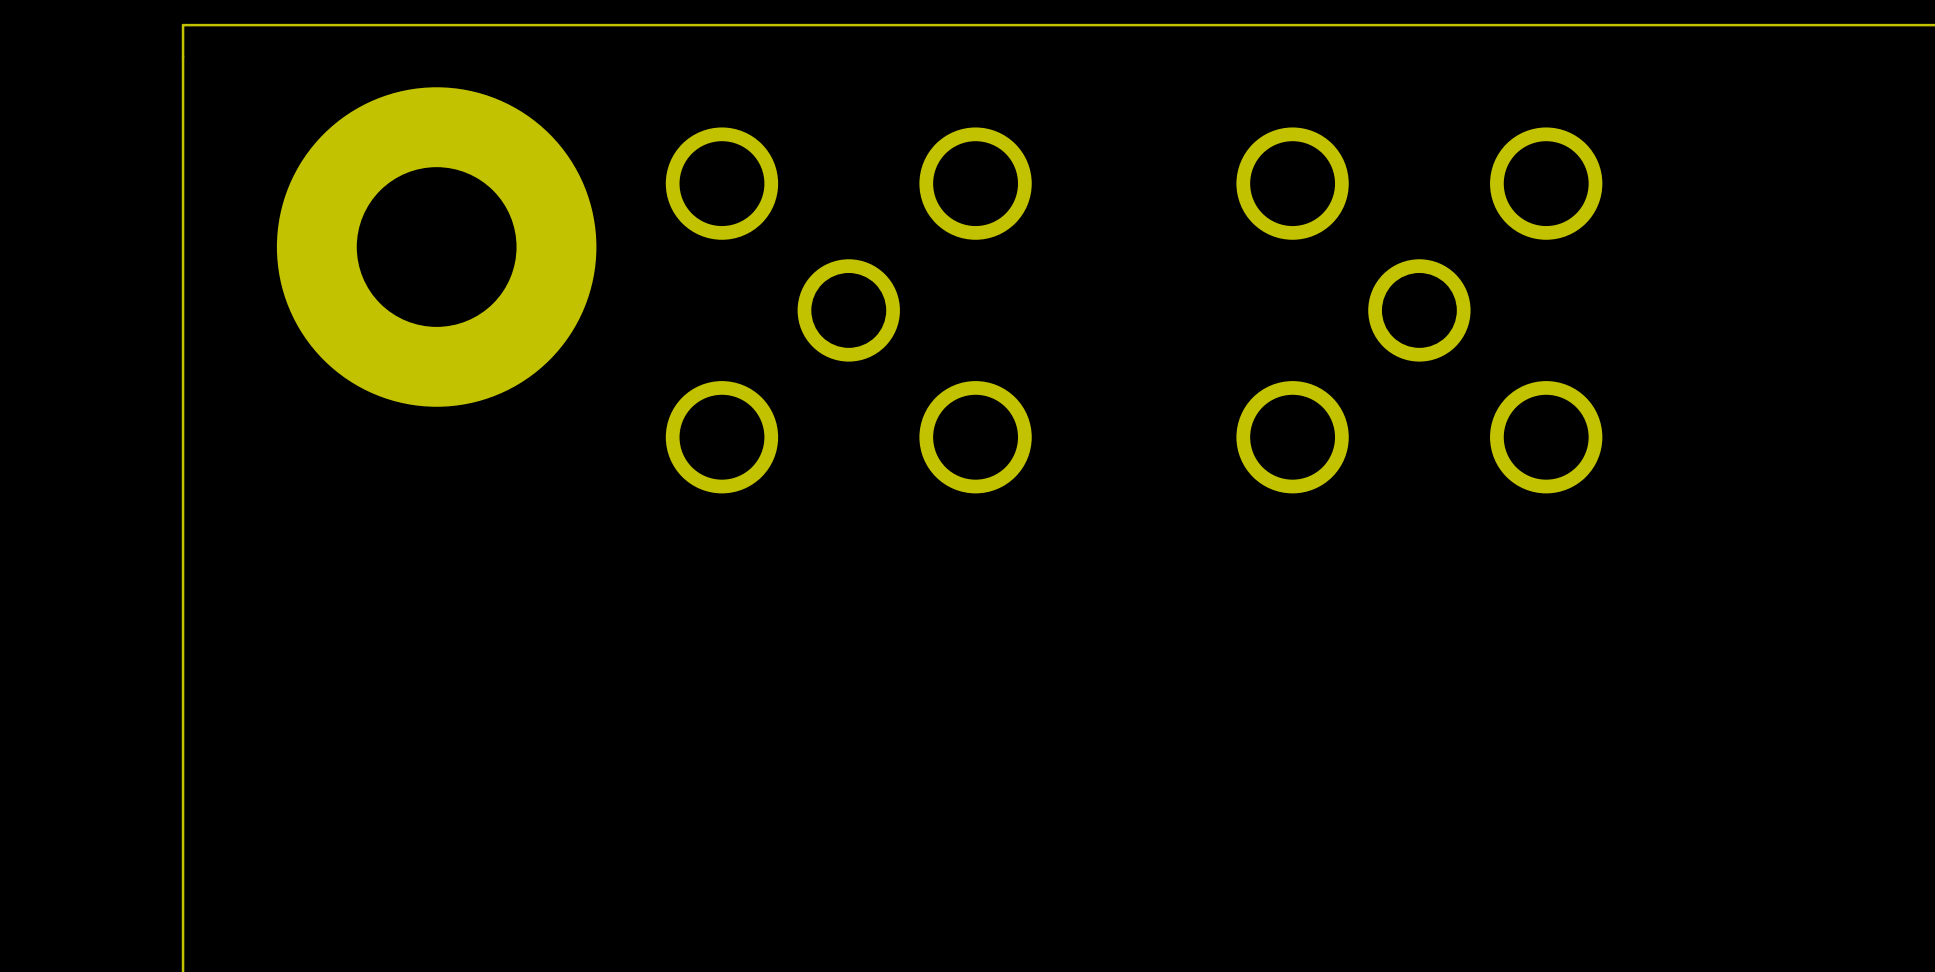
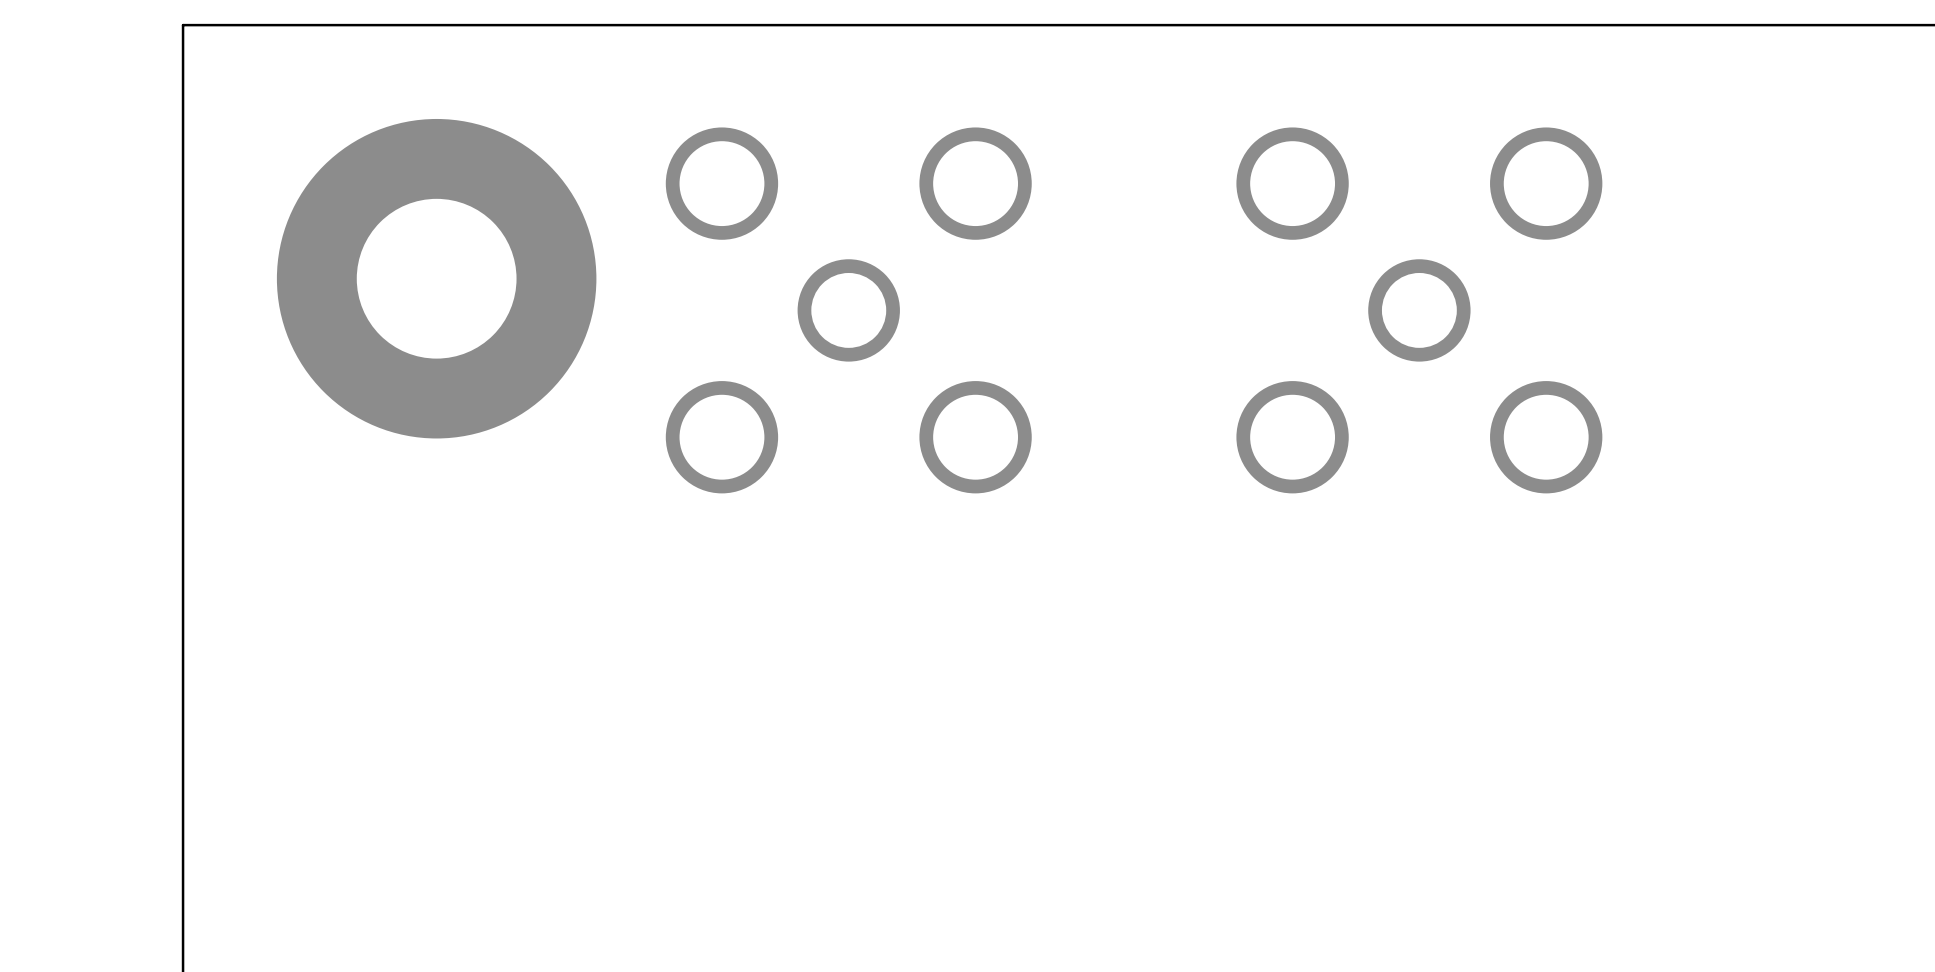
part position: (436, 247) -> (436, 278)

